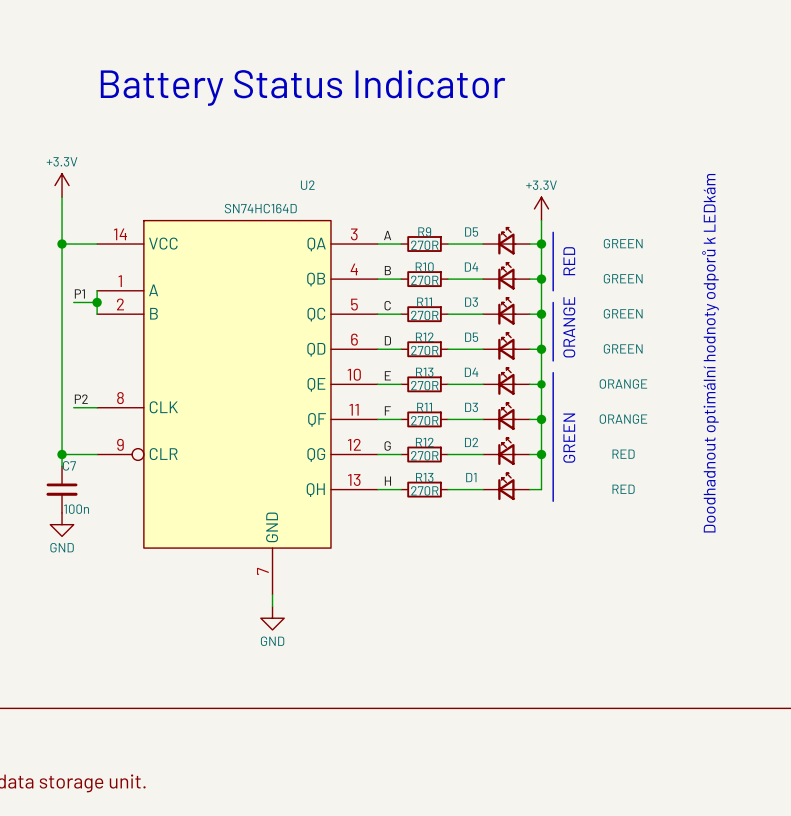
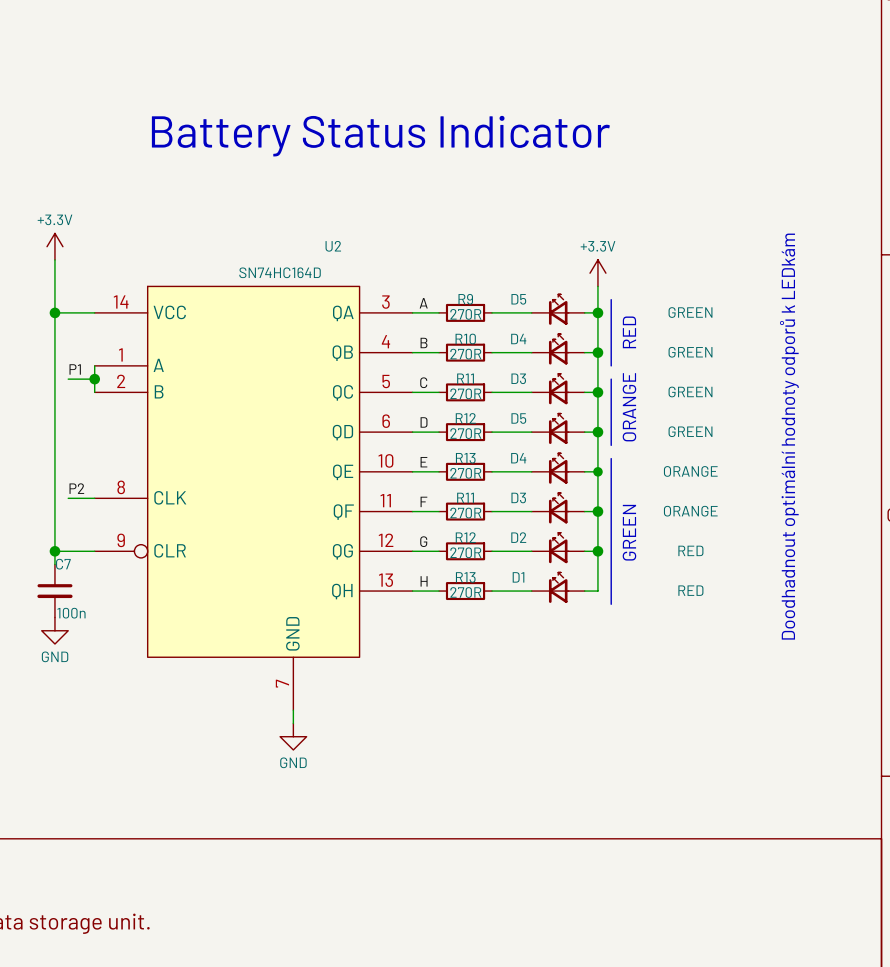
text position: Battery Status Indicator (303, 87) -> Battery Status Indicator (380, 136)

